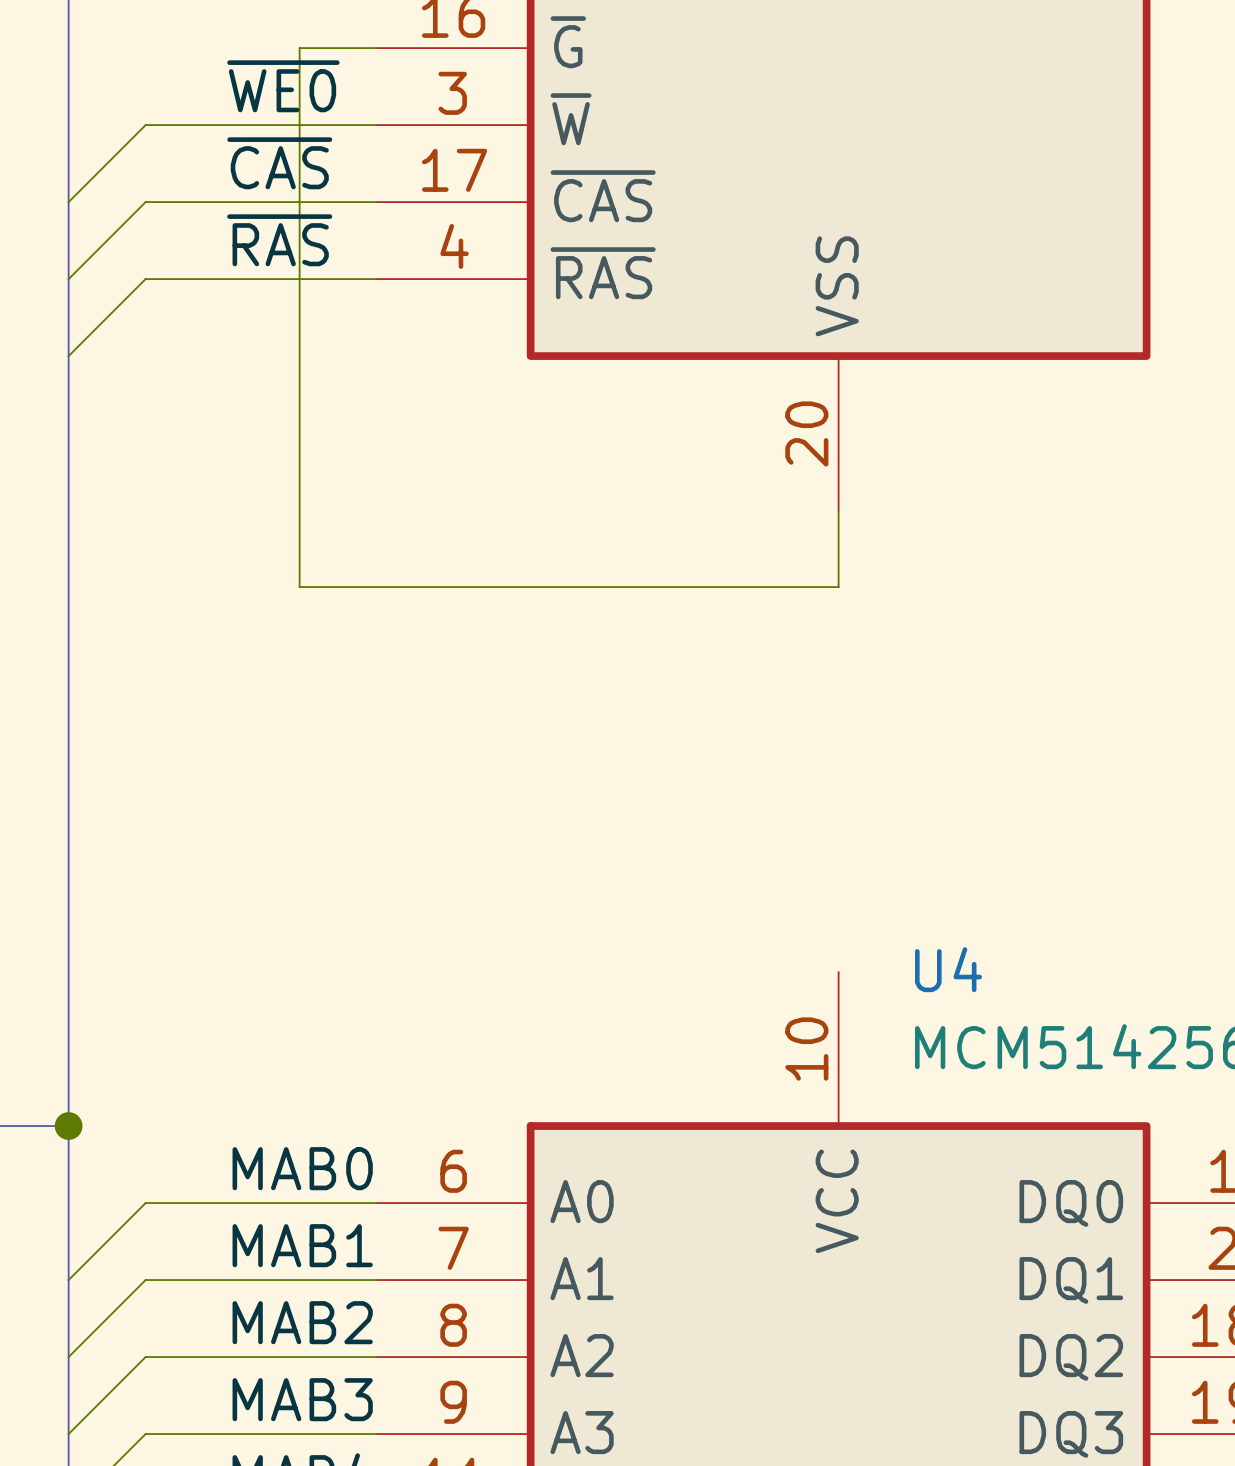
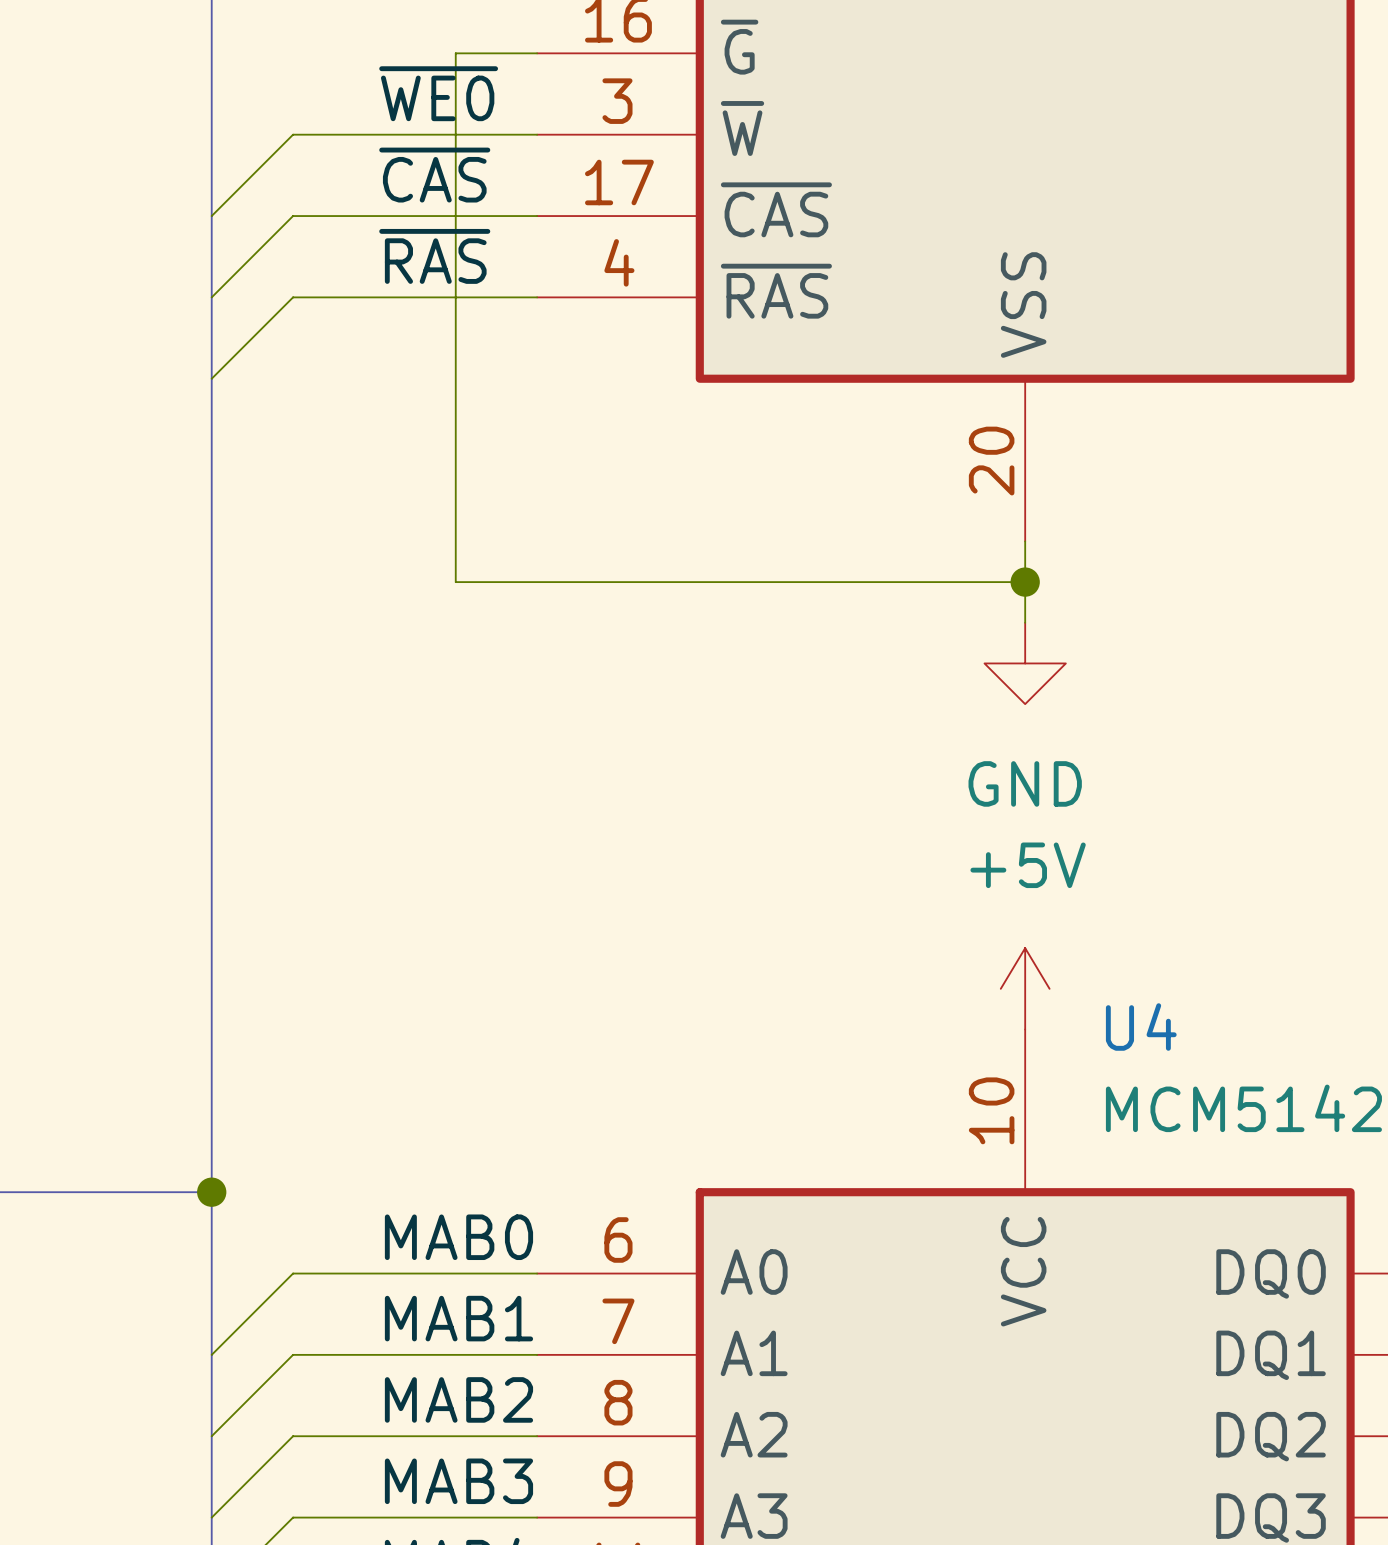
wire: (299, 548) (299, 587) (838, 587) -> (455, 582) (1025, 582)
junction: none -> (1025, 582)
power symbol: none -> GND (1025, 663)
power symbol: none -> +5V (1025, 988)

